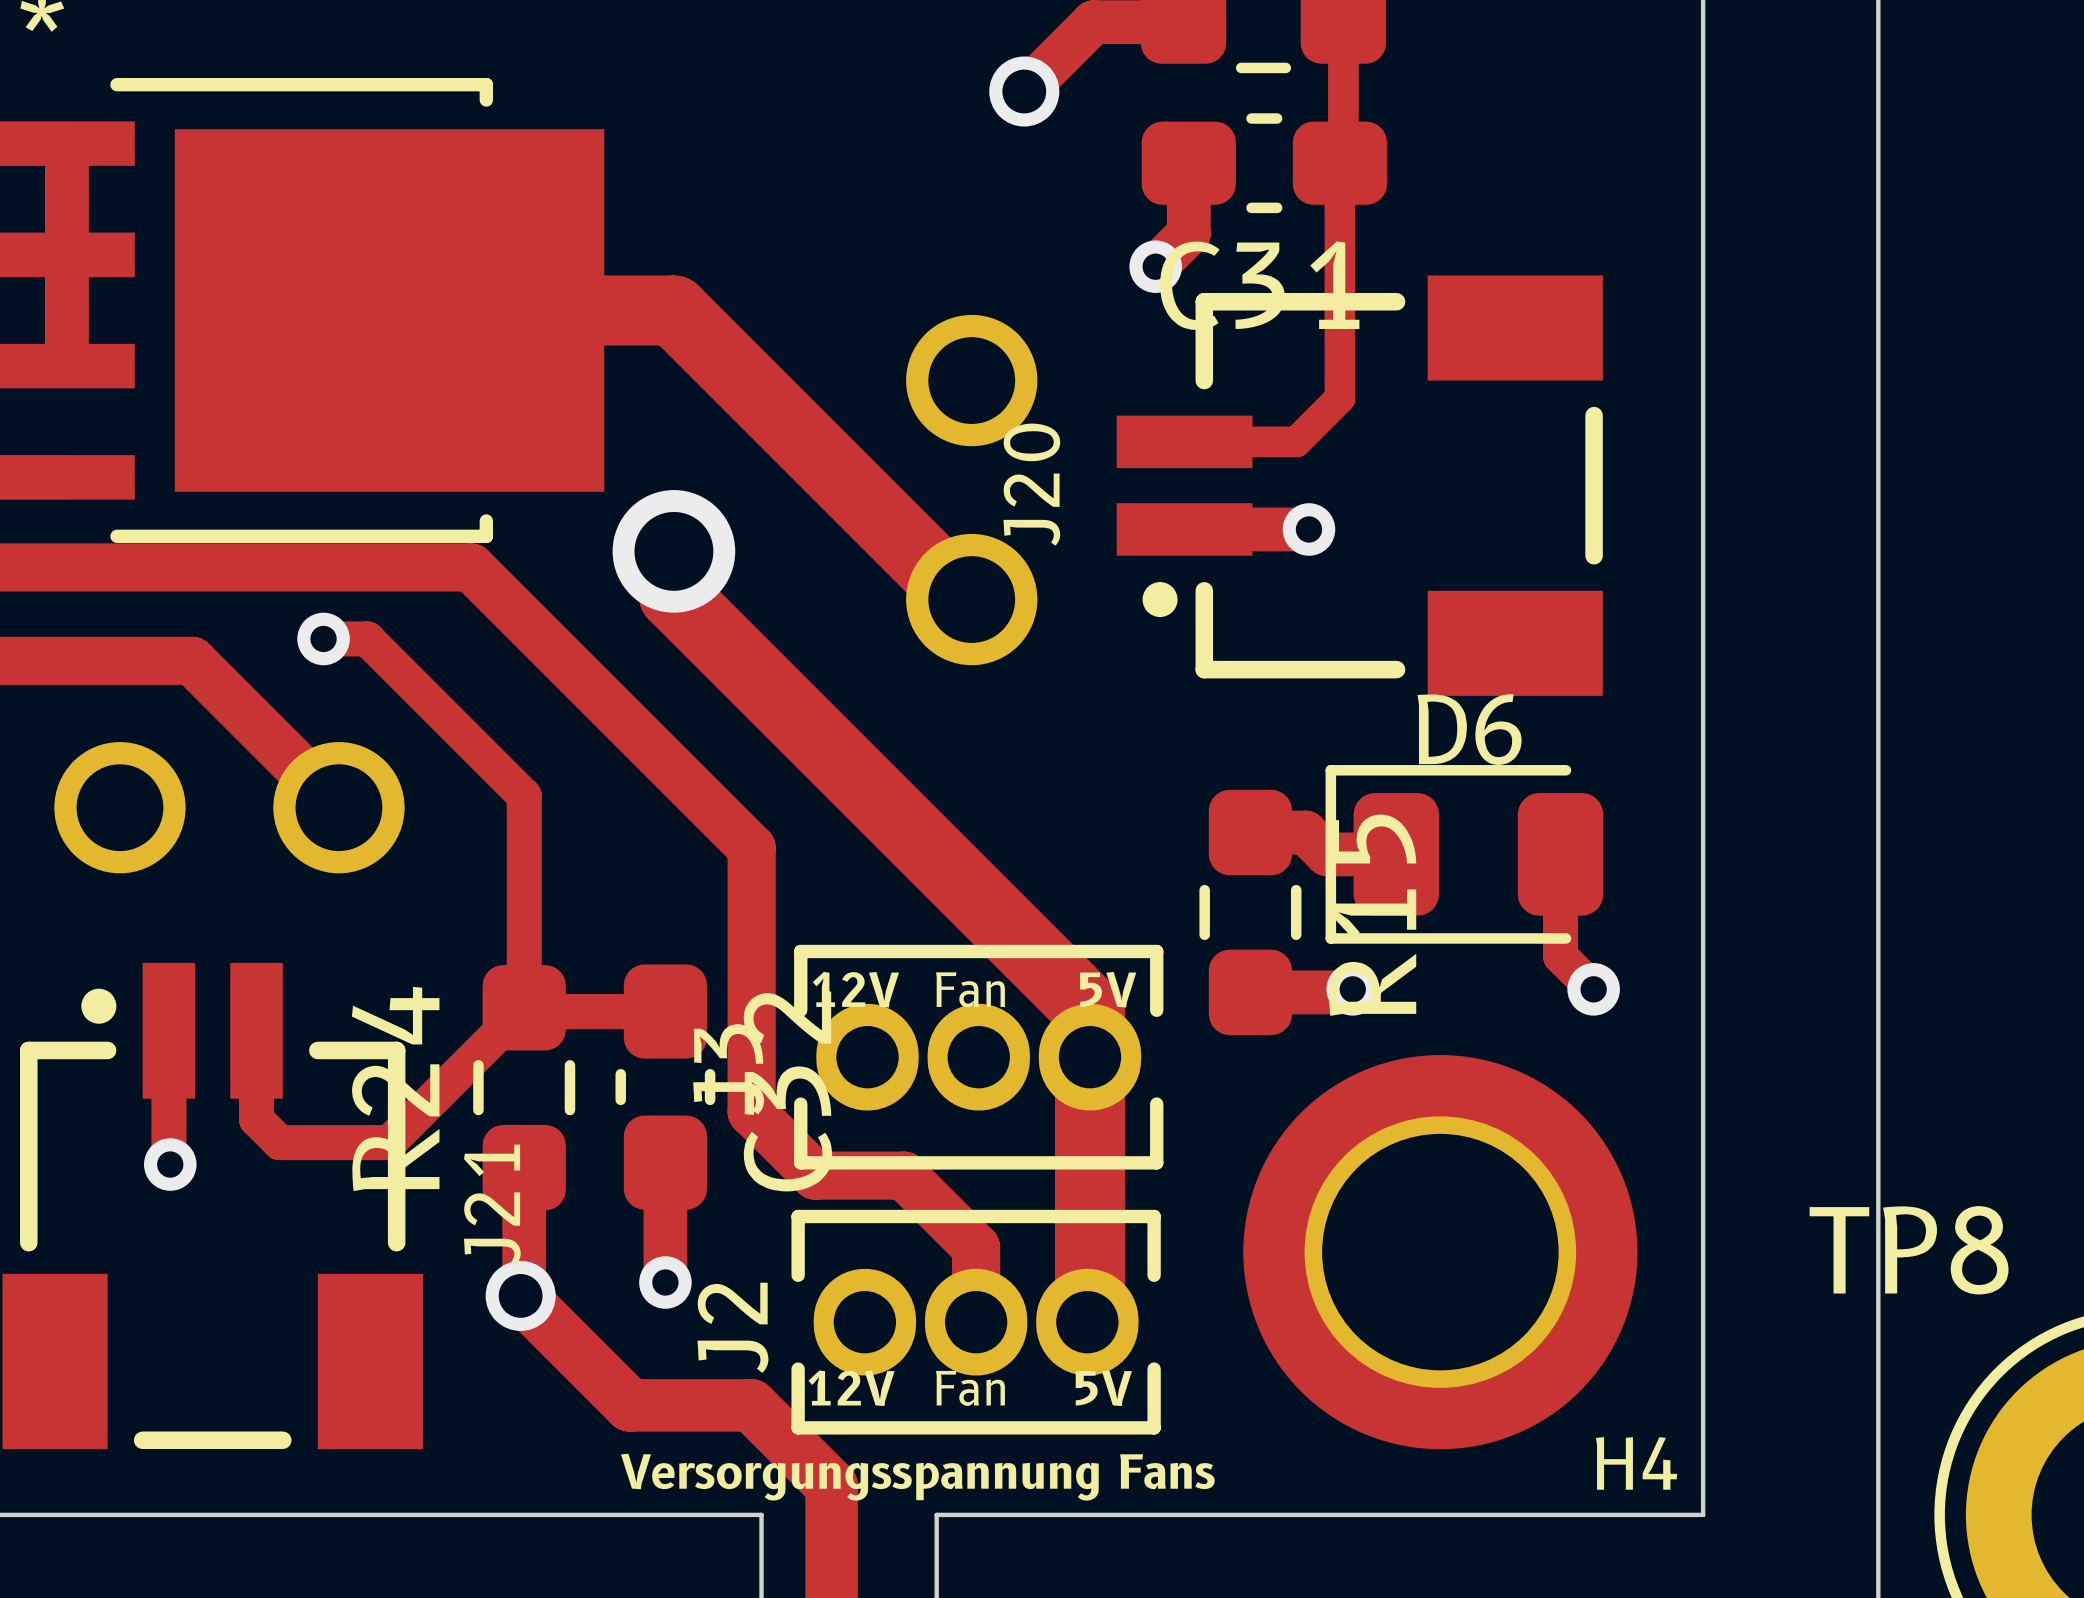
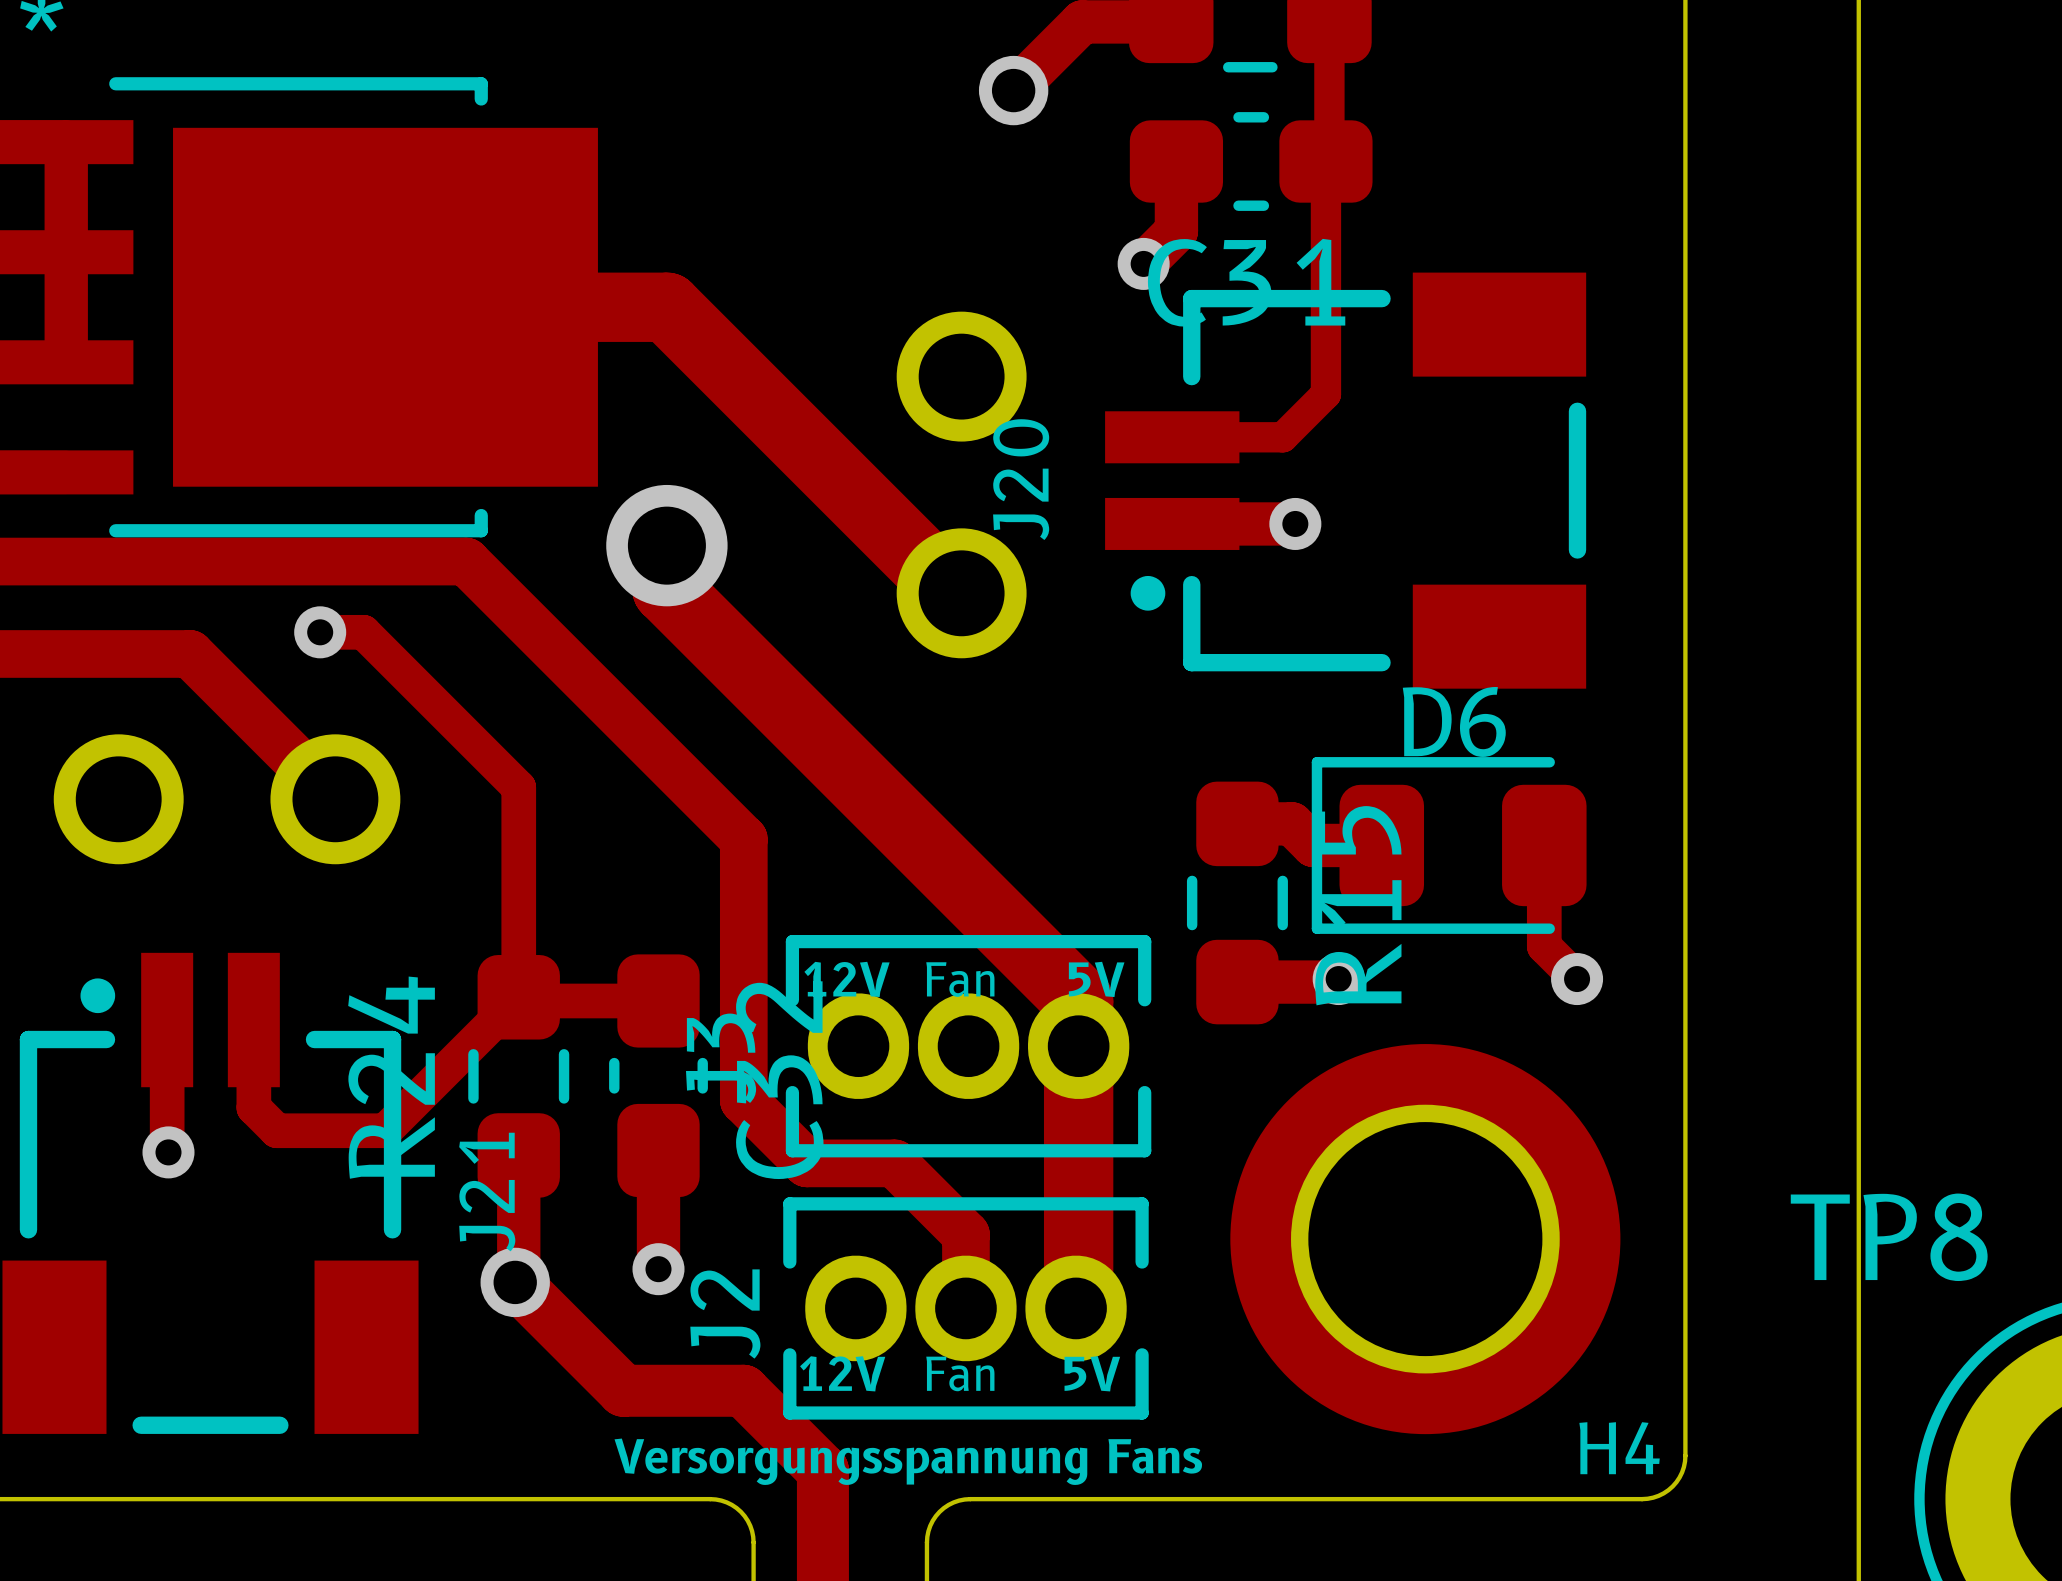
board edge: (1703, 1471) (1703, 1514) (1659, 1514) -> (1685, 1455) (1682, 1472) (1672, 1486) (1658, 1495) (1642, 1499)
board edge: (717, 1514) (761, 1514) (761, 1558) -> (710, 1499) (726, 1502) (740, 1511) (750, 1525) (753, 1542)
board edge: (980, 1514) (936, 1514) (936, 1558) -> (970, 1499) (953, 1502) (939, 1511) (930, 1525) (926, 1542)

